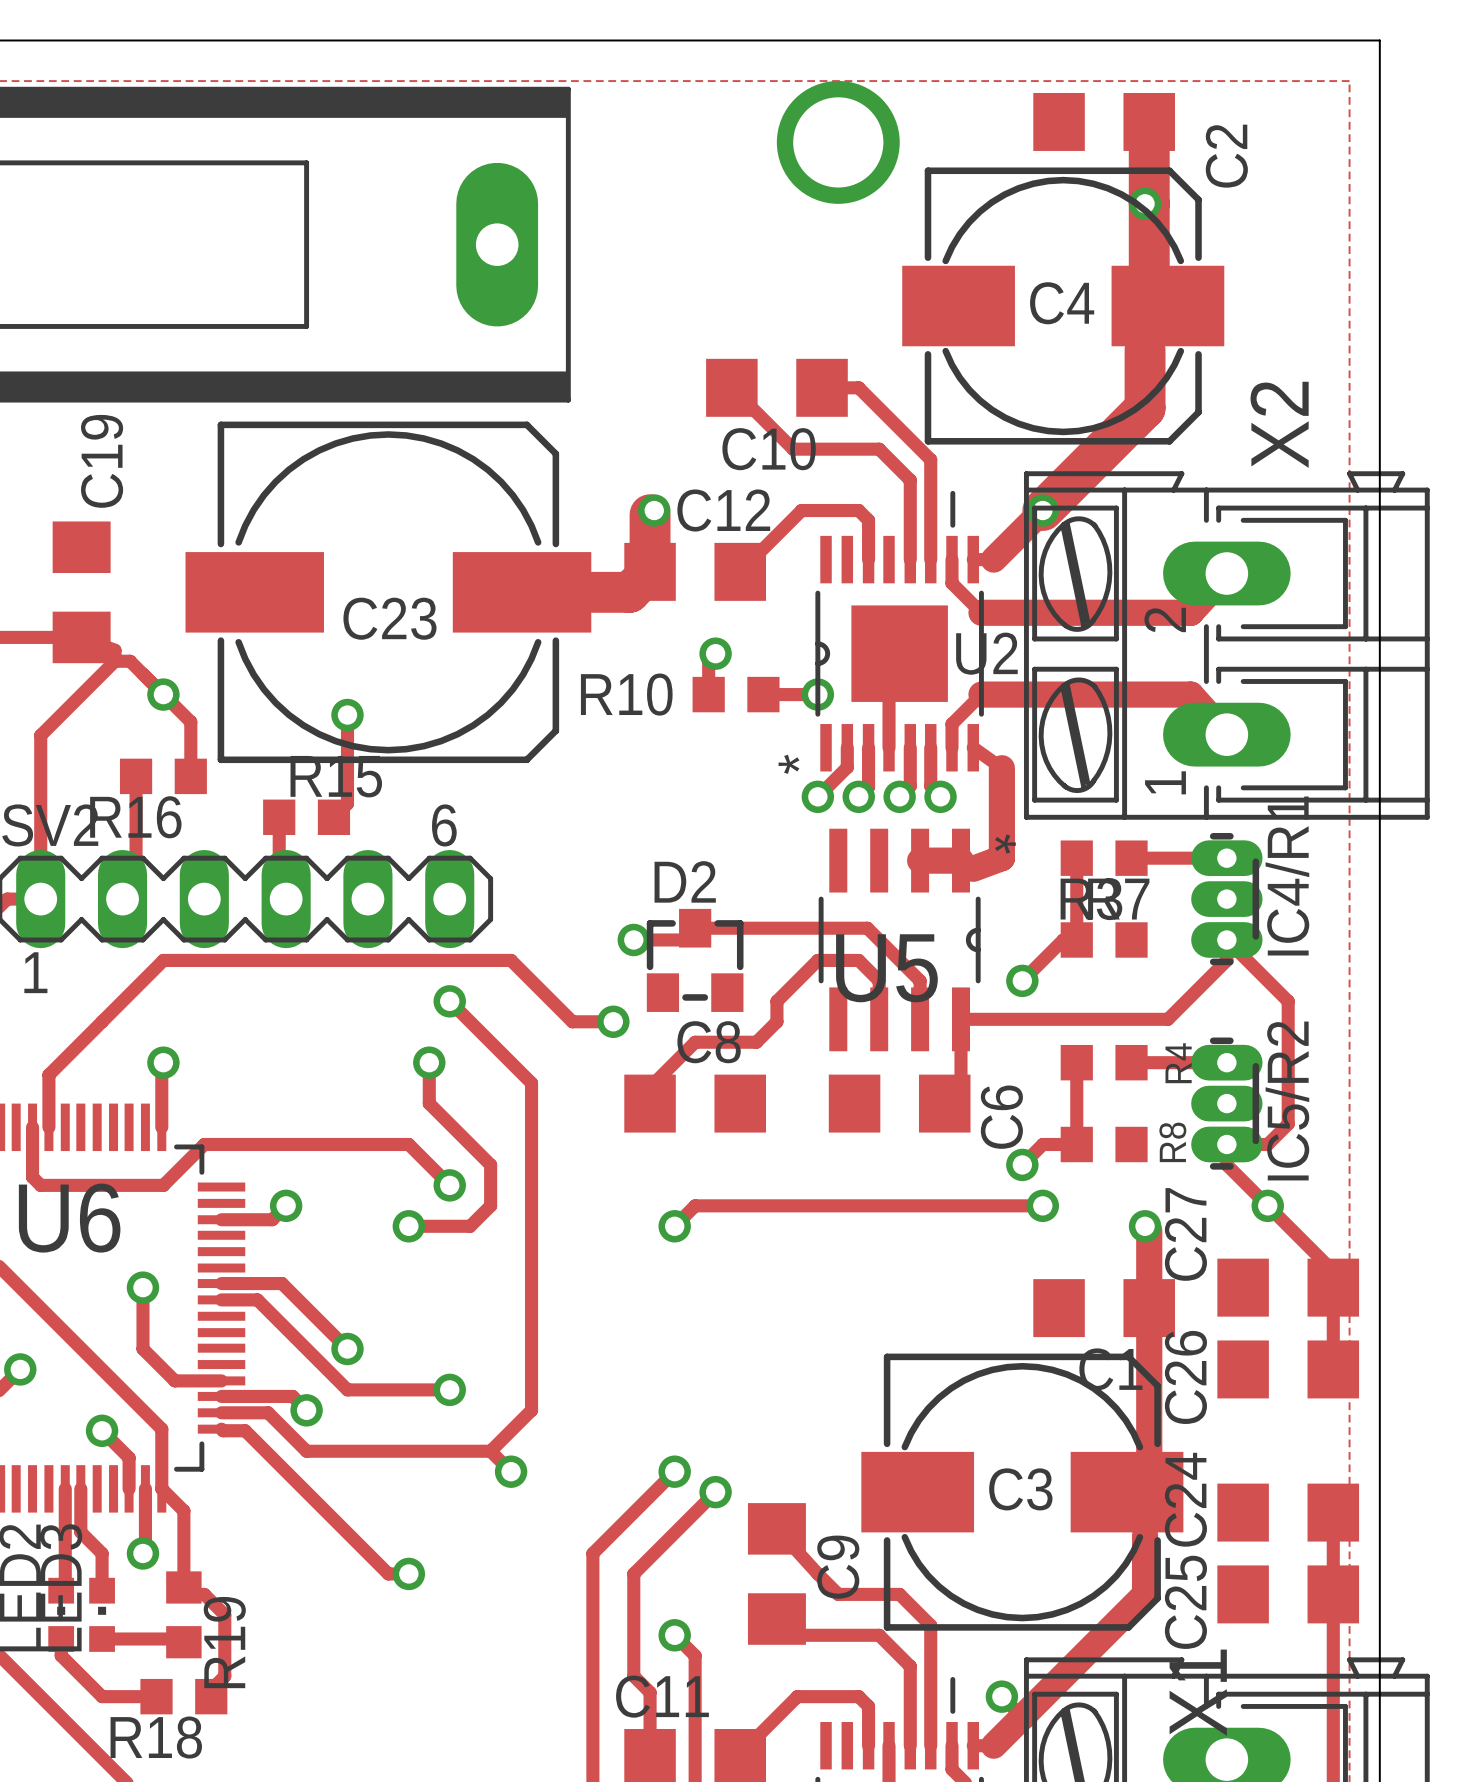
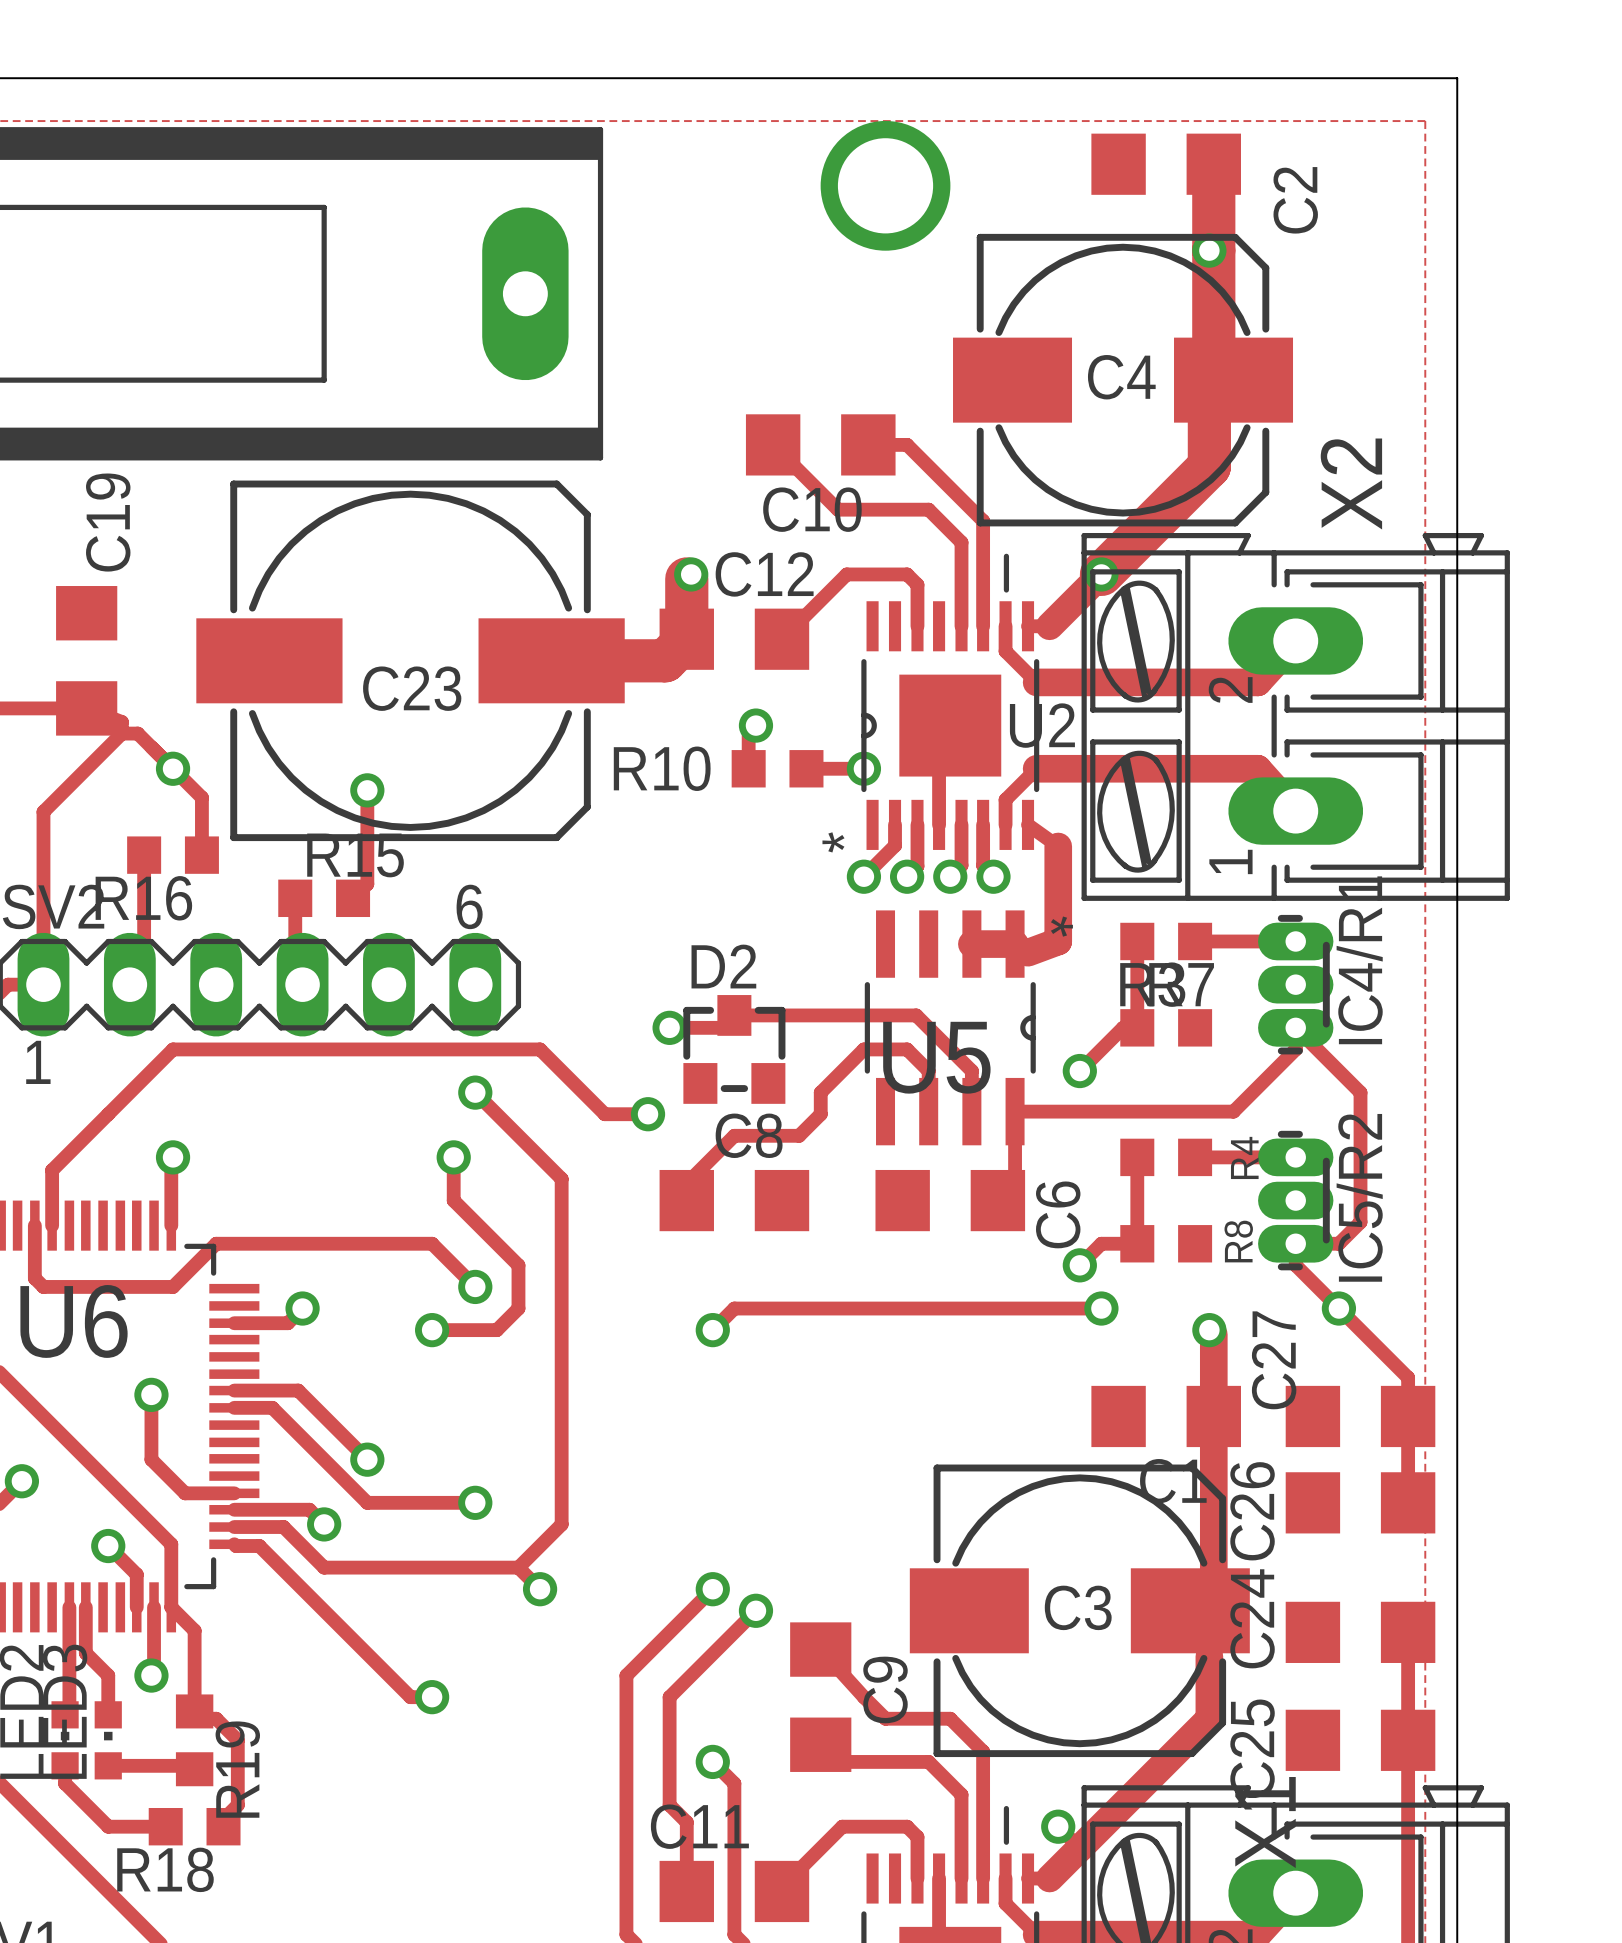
C4 position: (1063, 306) -> (1123, 380)
C27 name position: C27 (1185, 1234) -> C27 (1274, 1360)
C27 position: (1288, 1287) -> (1360, 1416)
C26 position: (1288, 1369) -> (1360, 1502)
C25 position: (1288, 1594) -> (1360, 1740)

